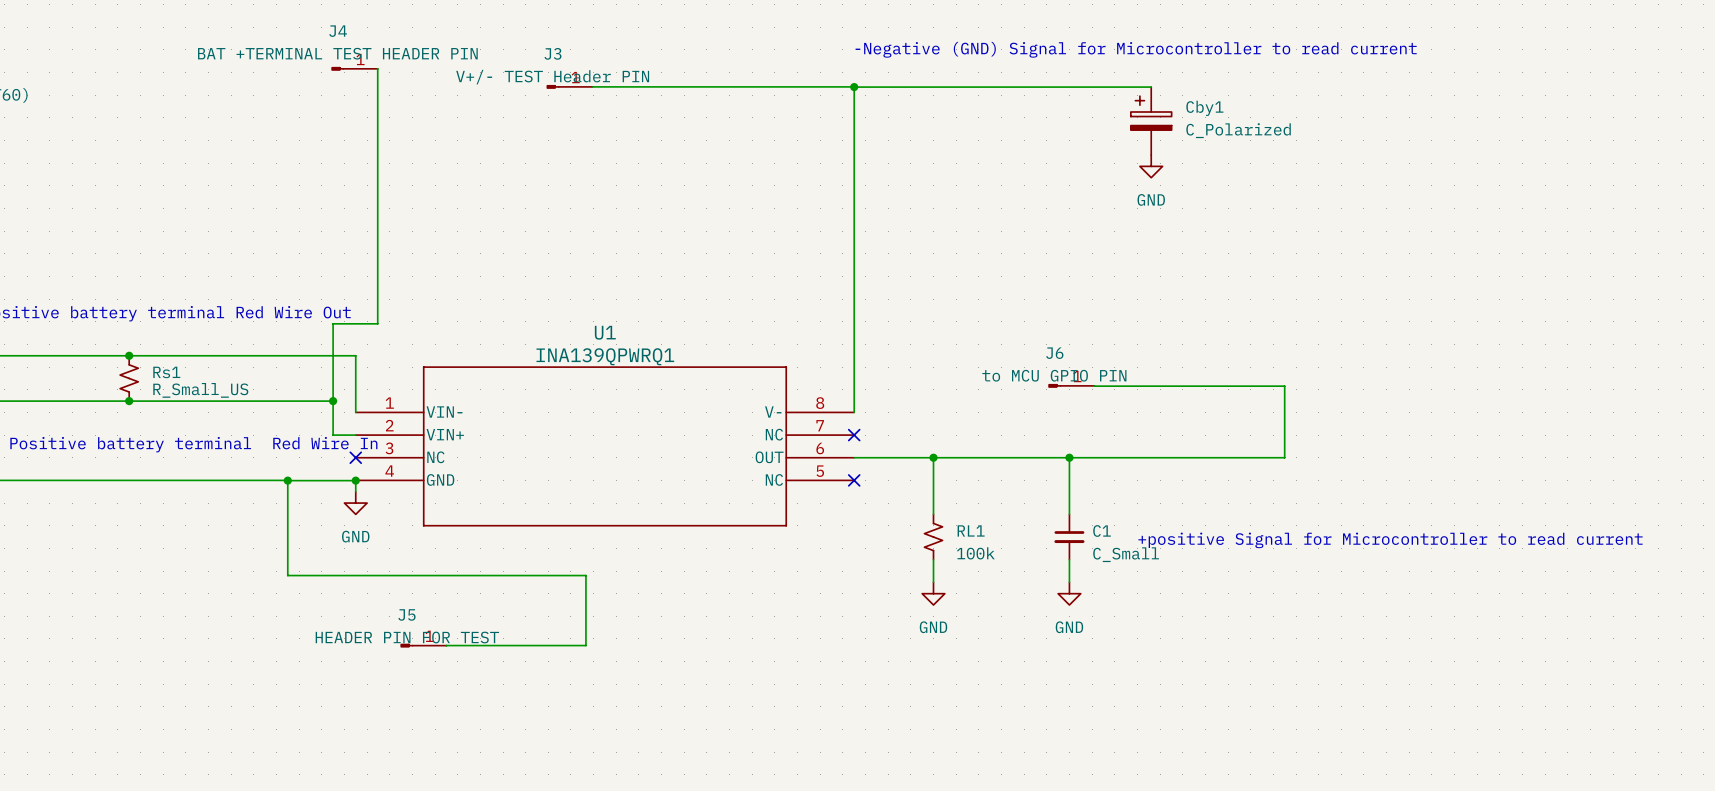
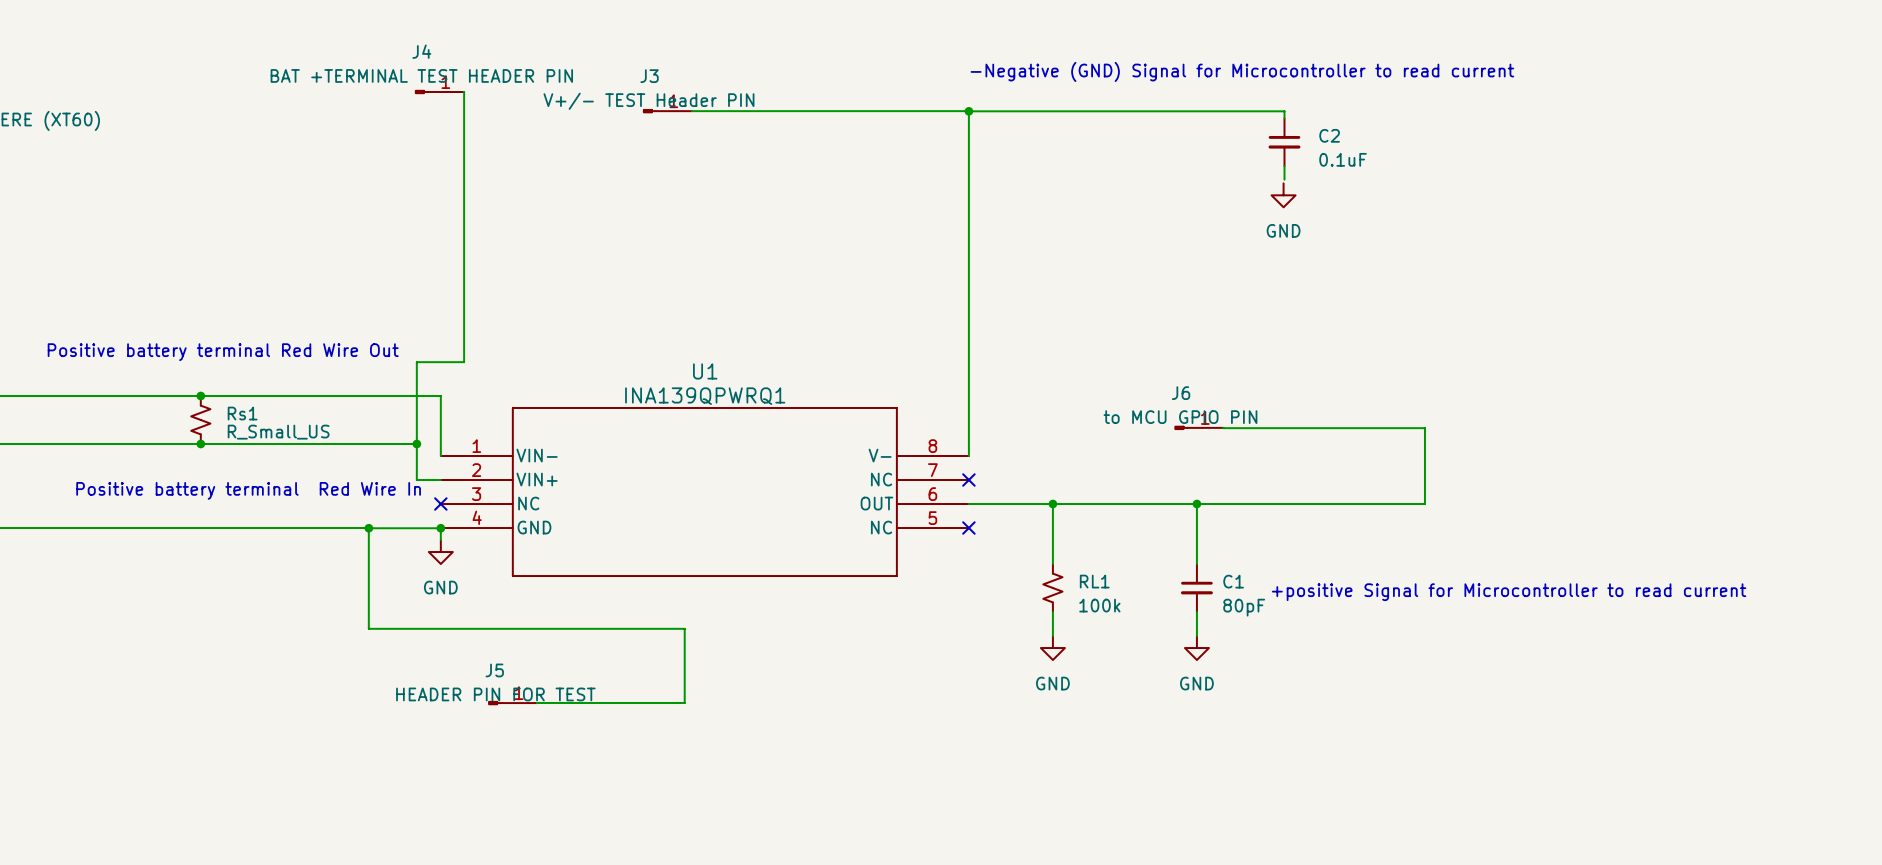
C2: none -> 0.1uF (1284, 142)
Cby1: C_Polarized (1151, 121) -> none
C1 value: C_Small (1126, 554) -> 80pF (1244, 607)

